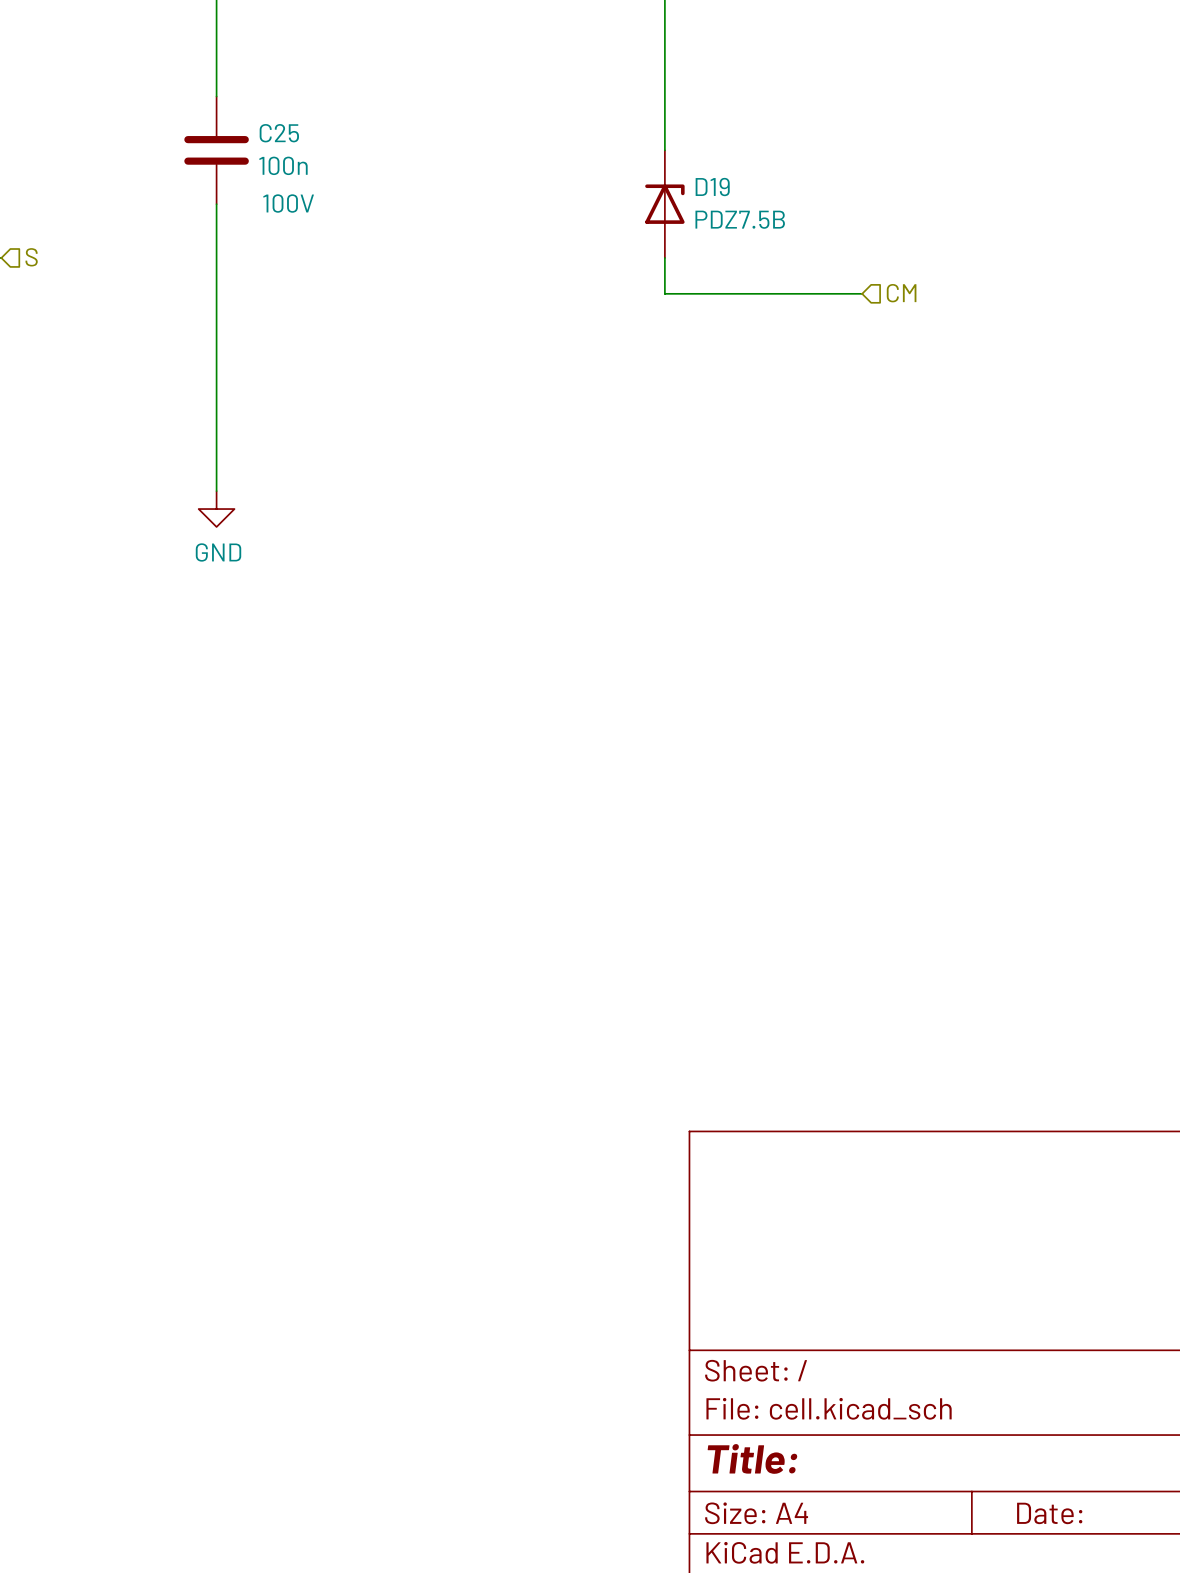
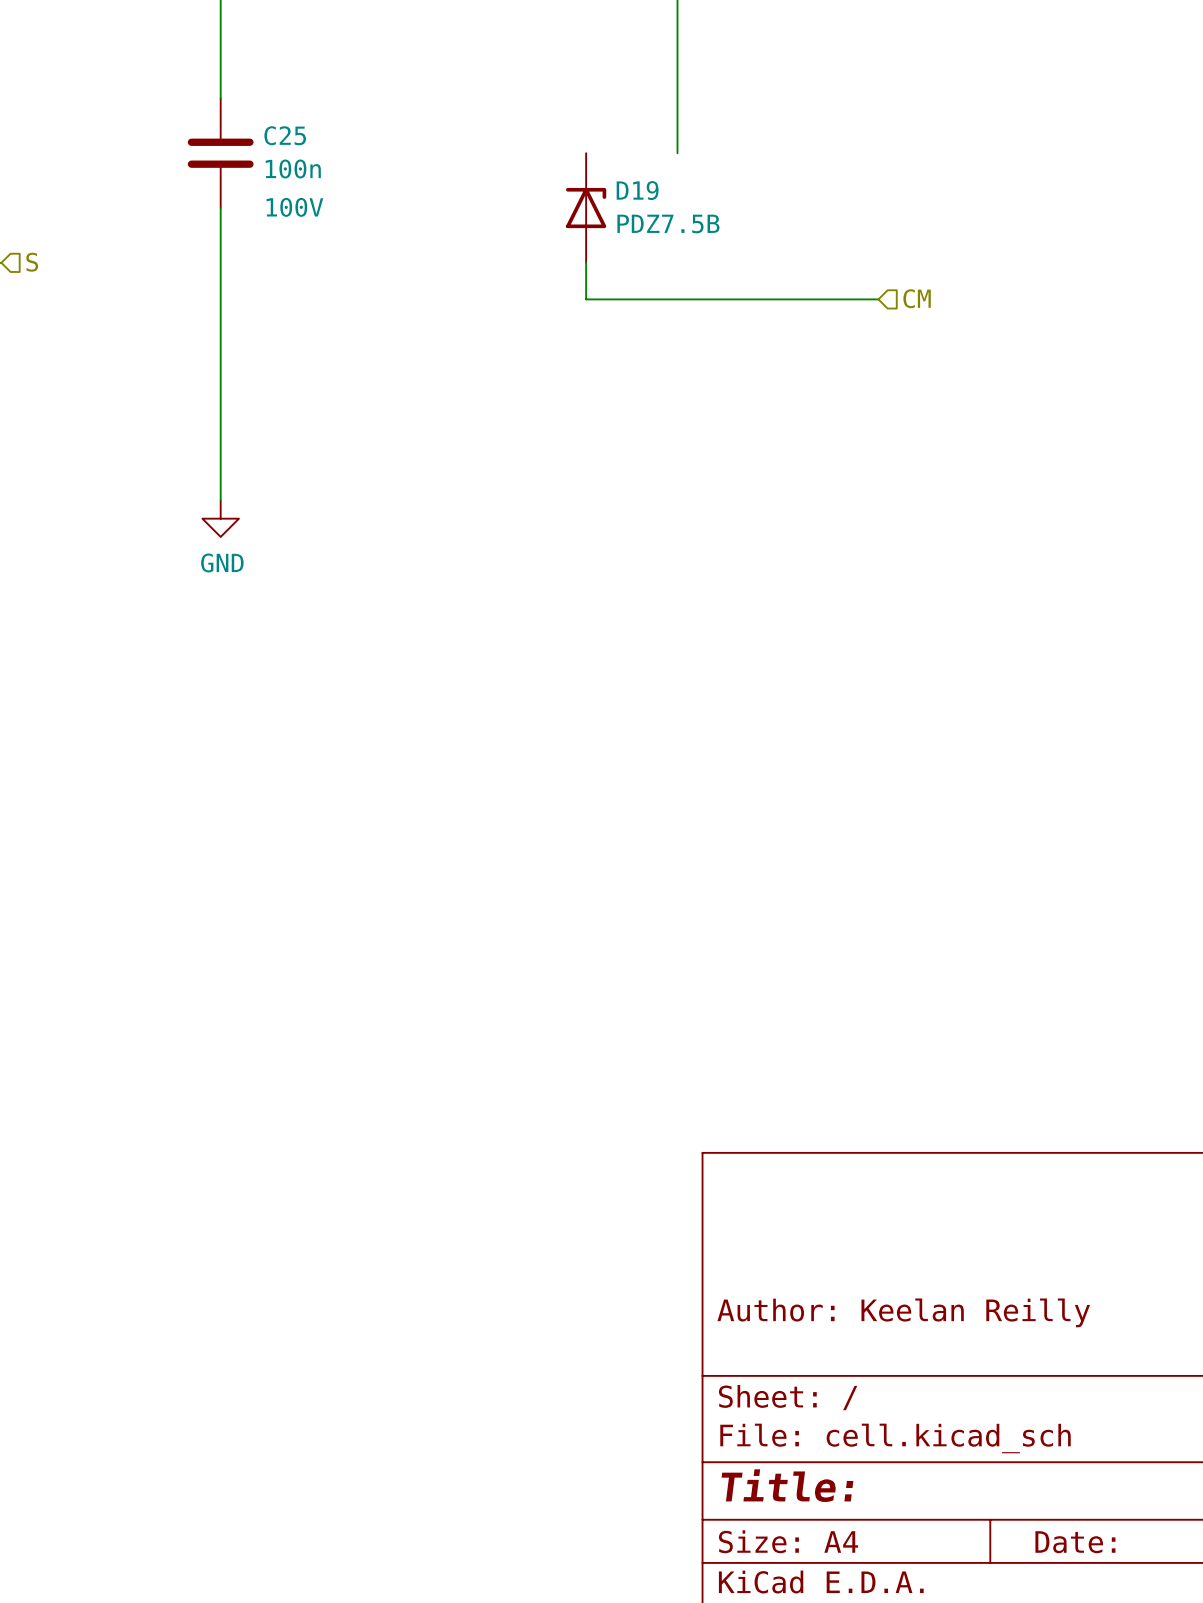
D19 position: (664, 204) -> (586, 208)
wire: (664, 257) (664, 293) -> (586, 262) (586, 299) (677, 299)
title block: none -> Author: Keelan Reilly (903, 1312)

